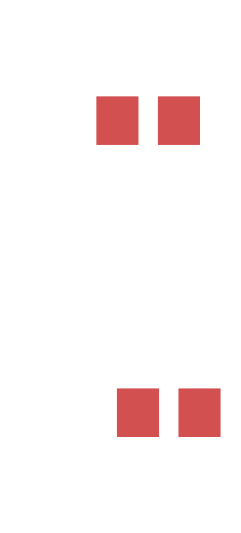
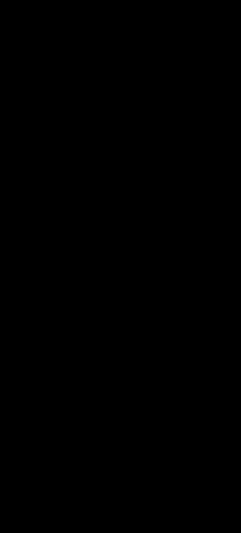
part: (148, 120) -> none
part: (168, 412) -> none

